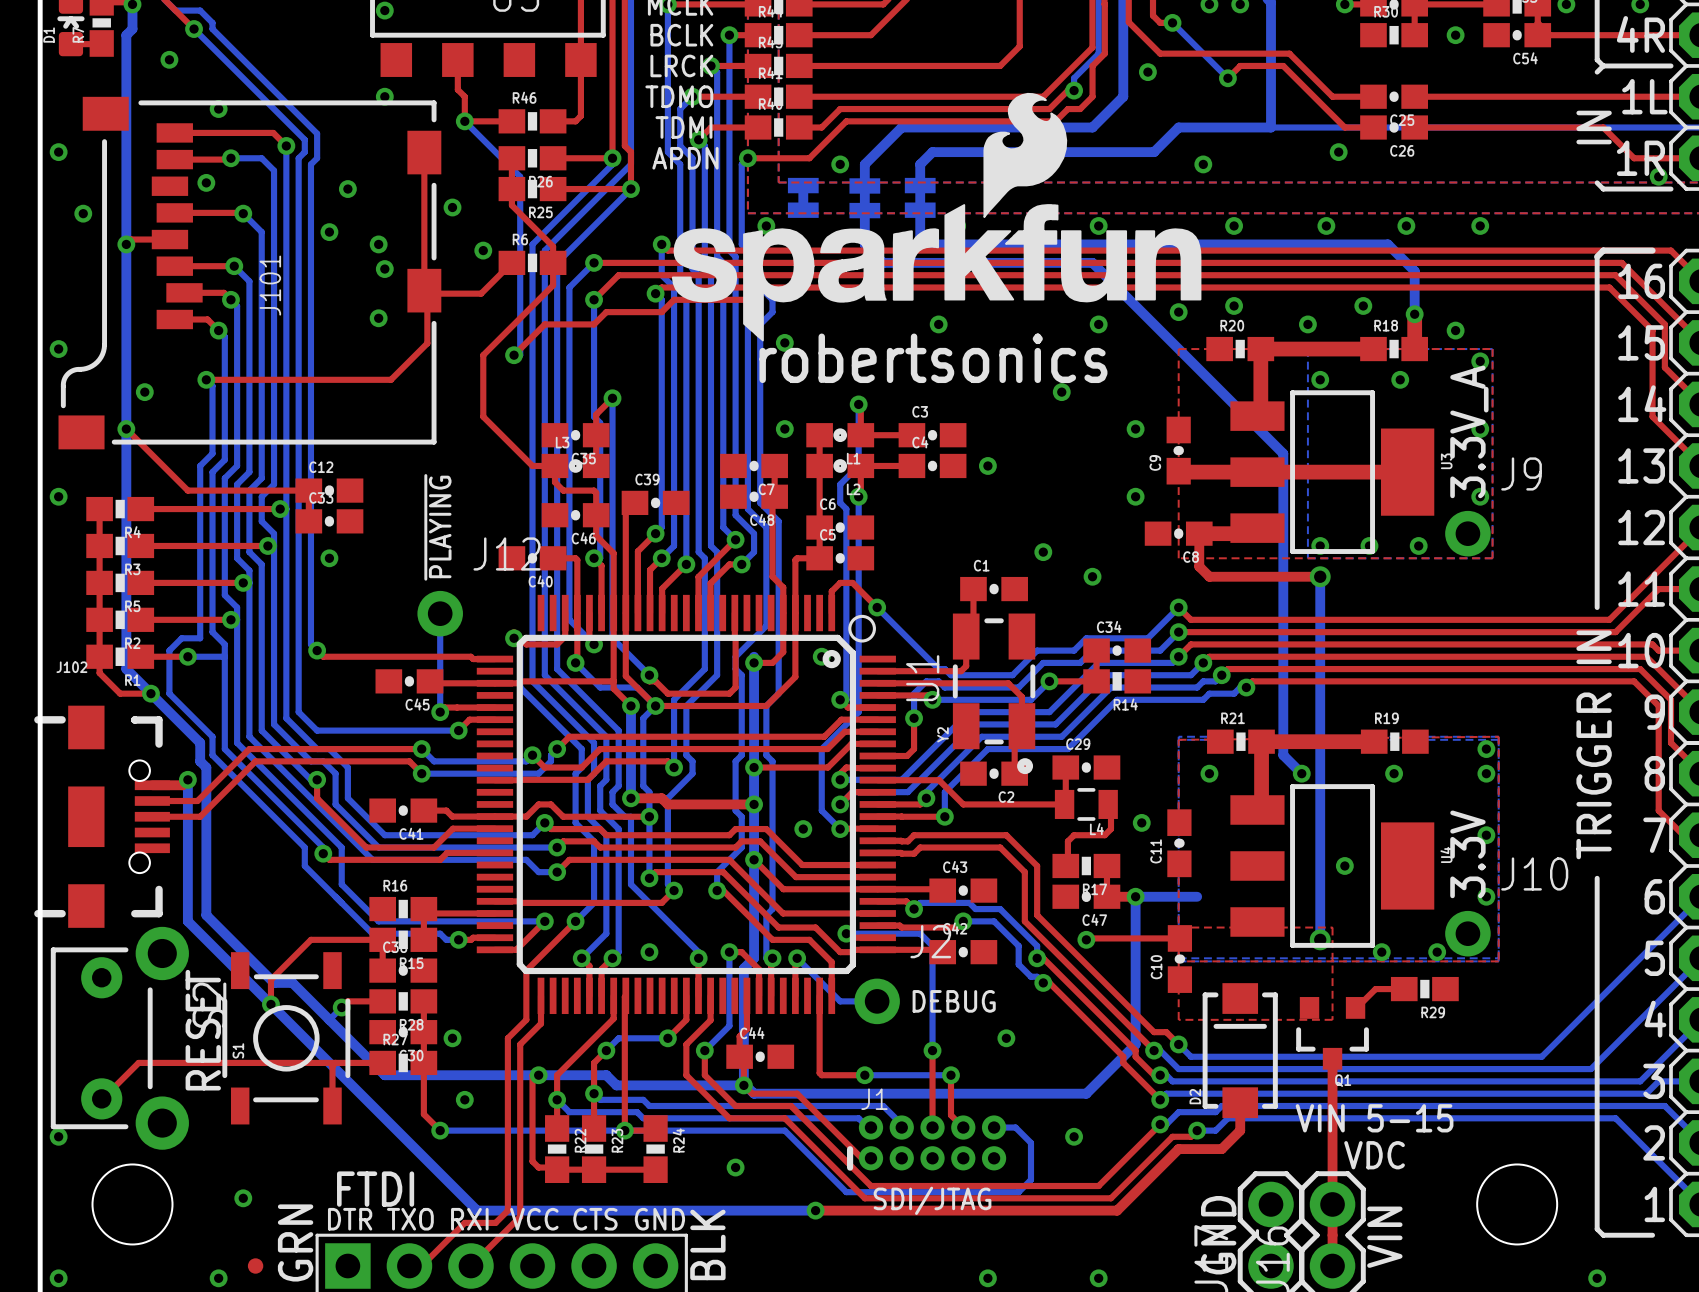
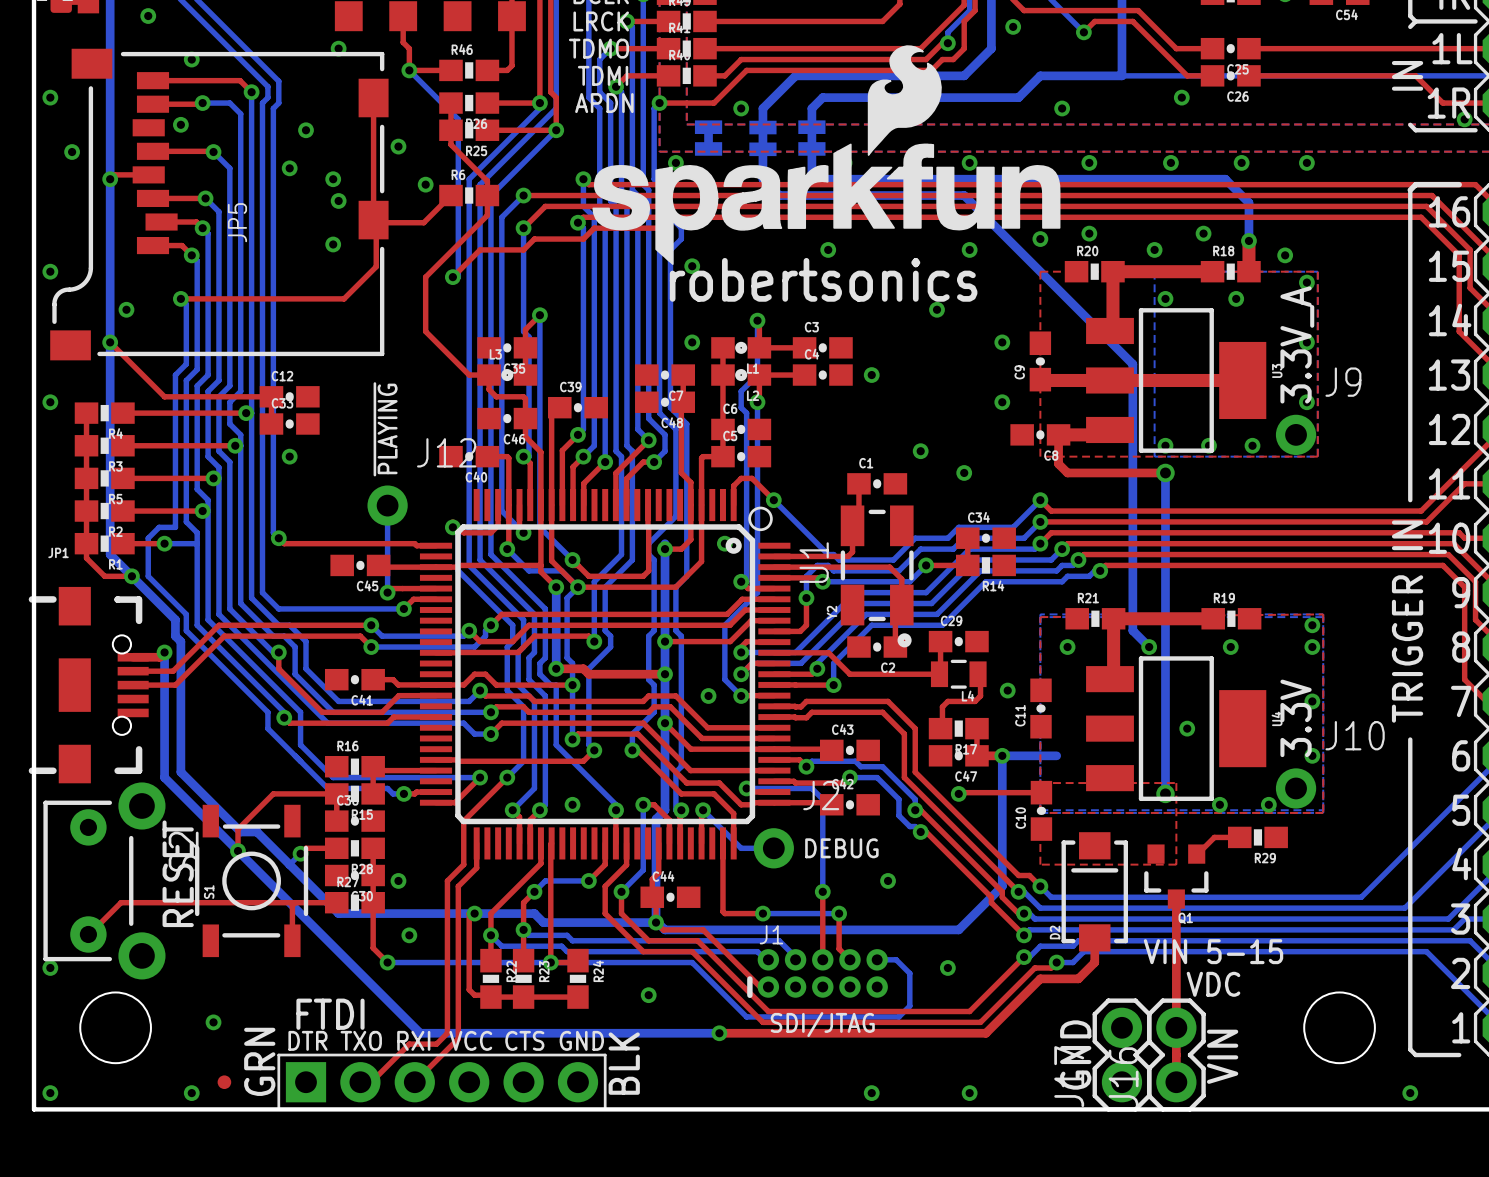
J101 name: J101 (270, 285) -> JP5 (237, 222)
J102 name: J102 (71, 667) -> JP1 (58, 552)

